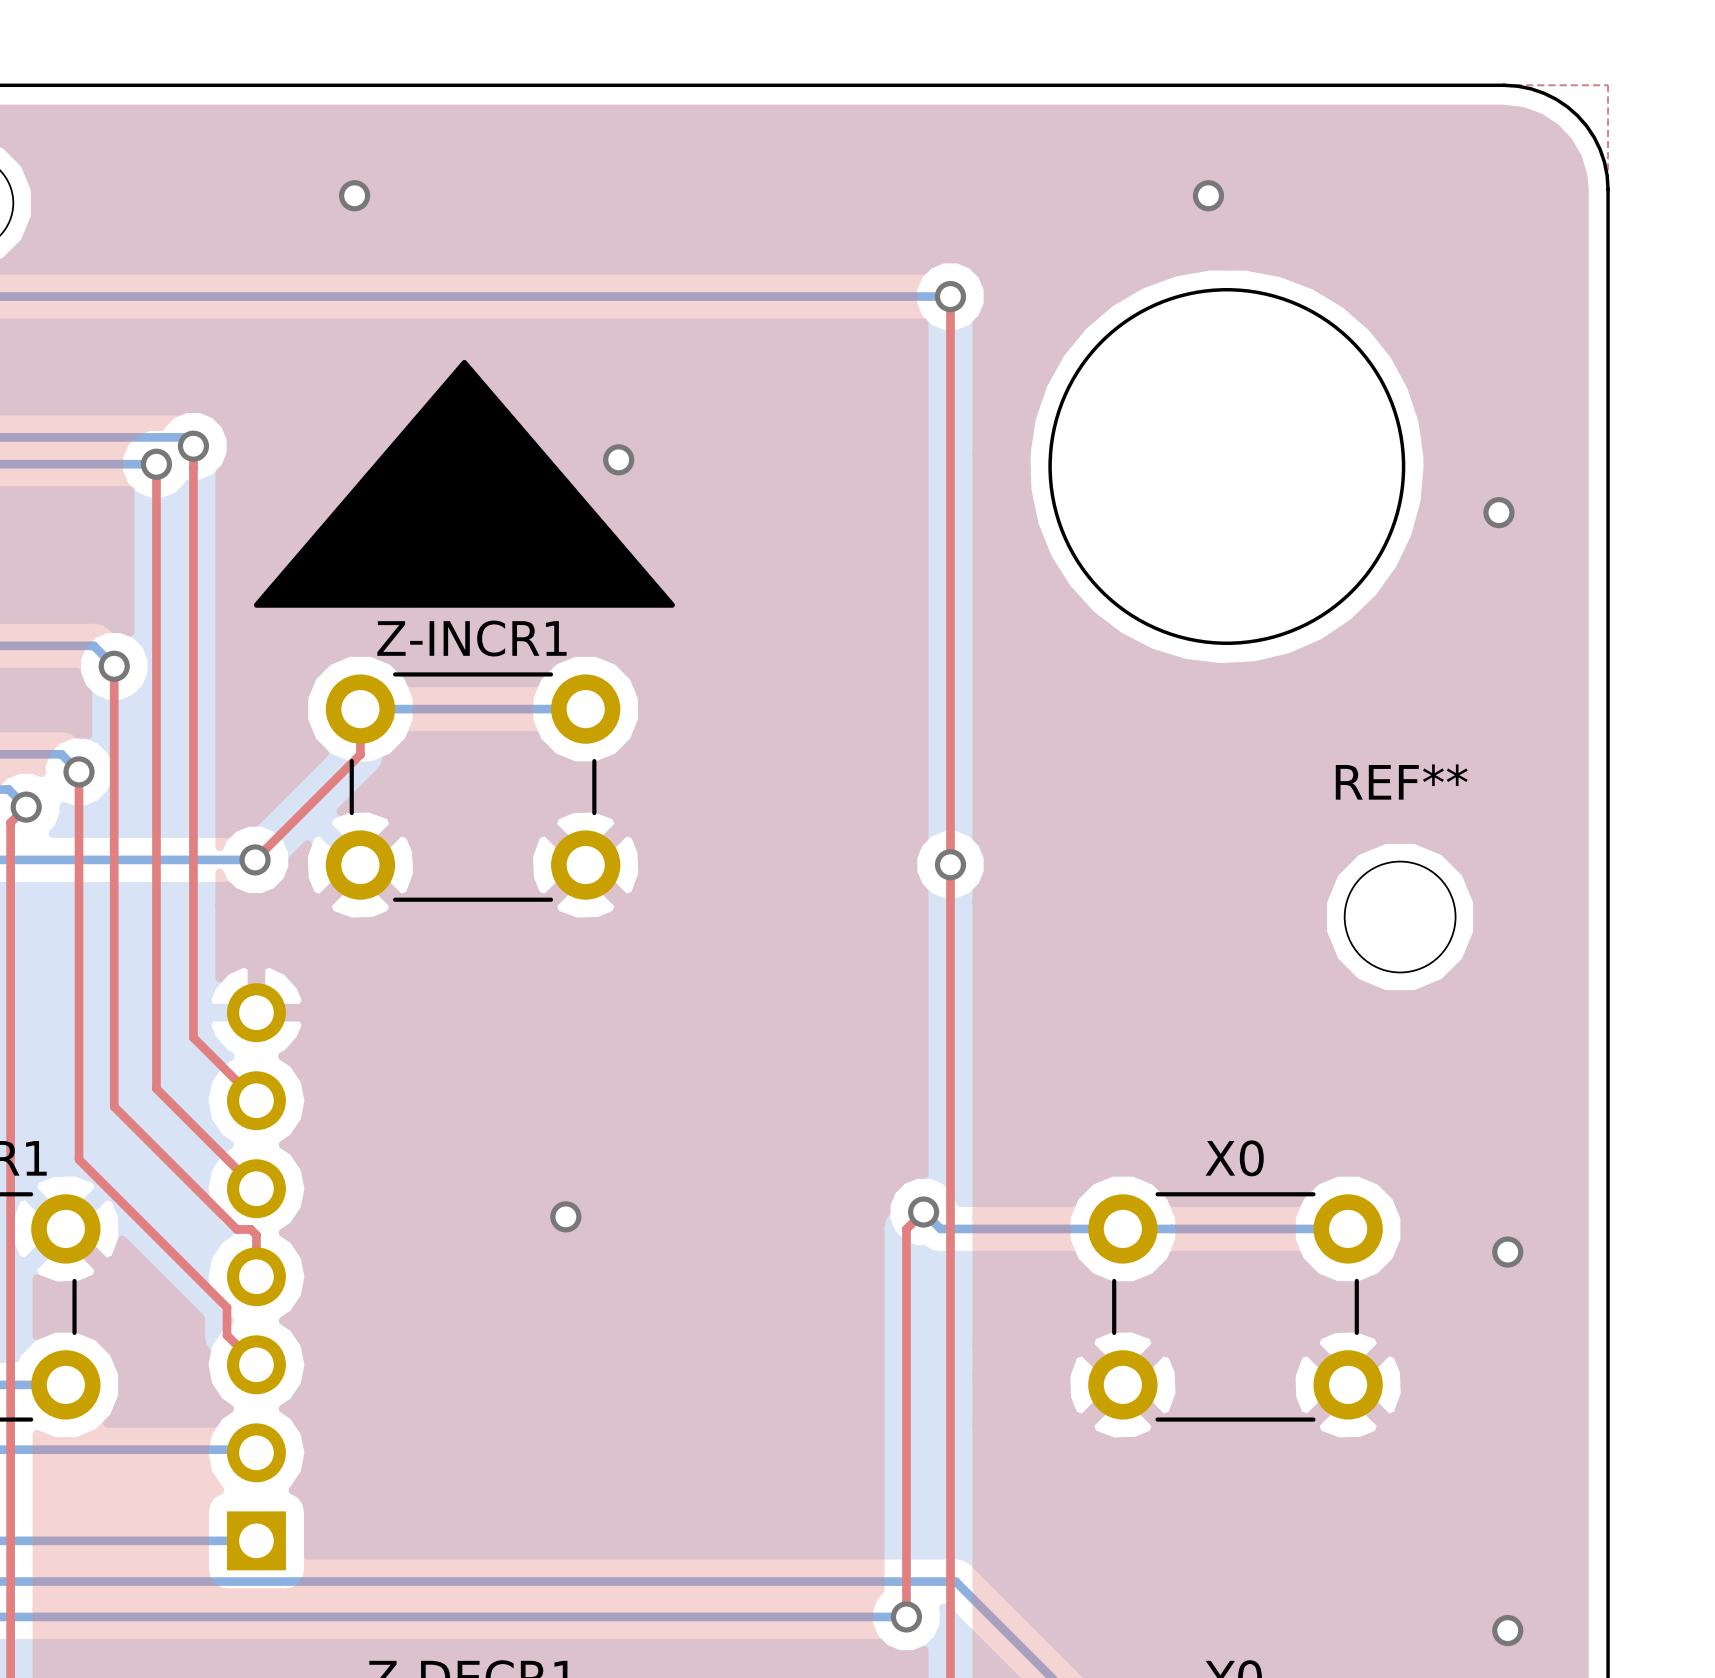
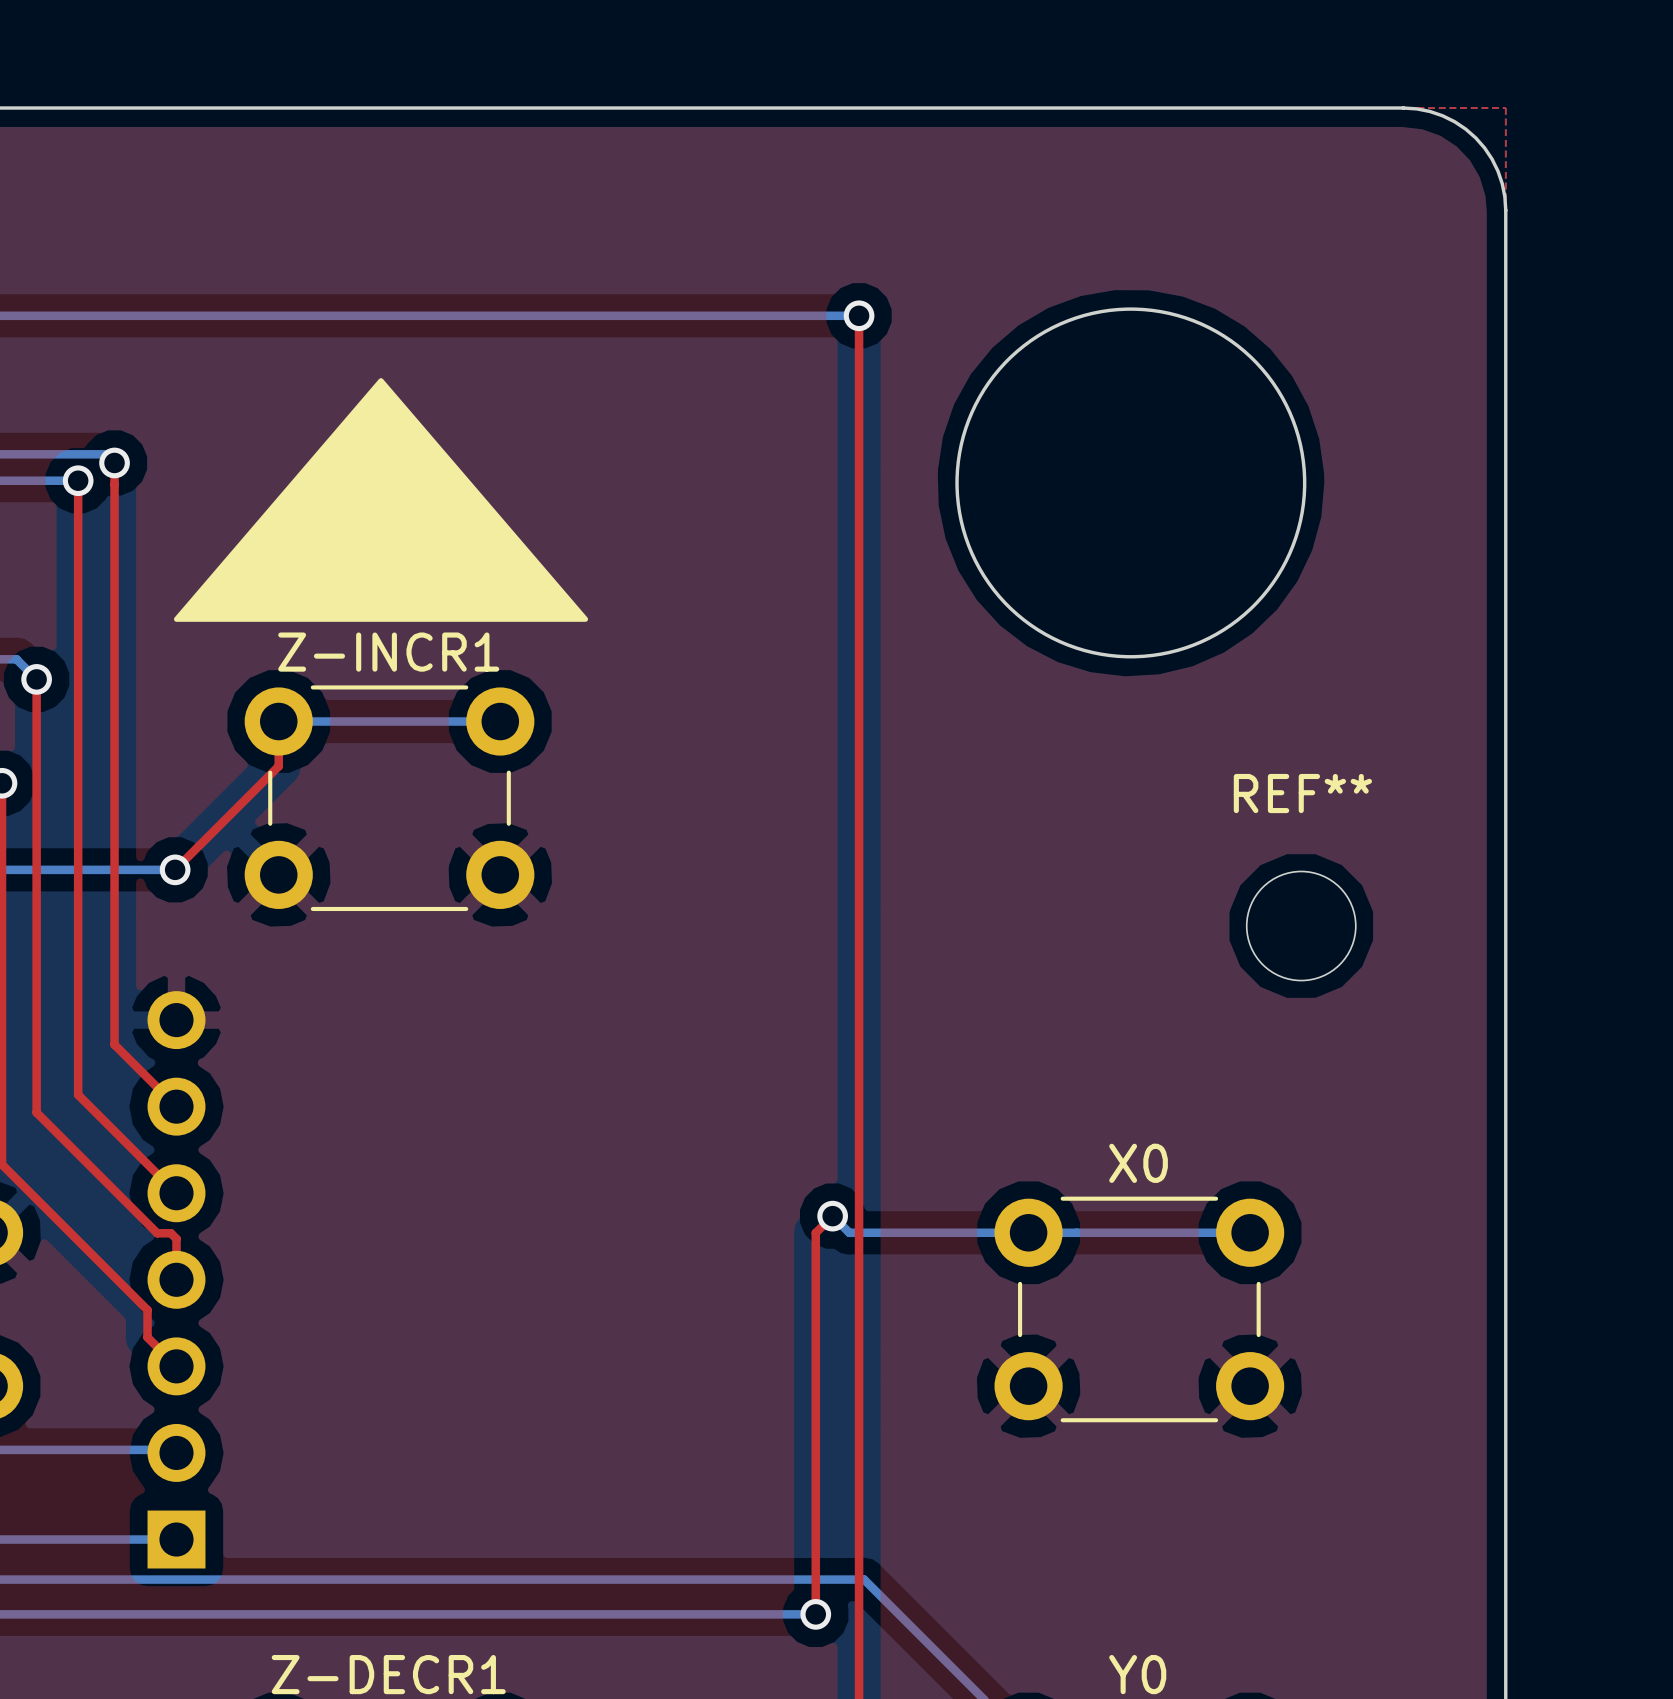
via: (354, 195) -> none
via: (1208, 195) -> none
via: (618, 459) -> none
via: (1498, 512) -> none
via: (950, 864) -> none
via: (565, 1216) -> none
via: (1507, 1252) -> none
via: (1507, 1630) -> none

